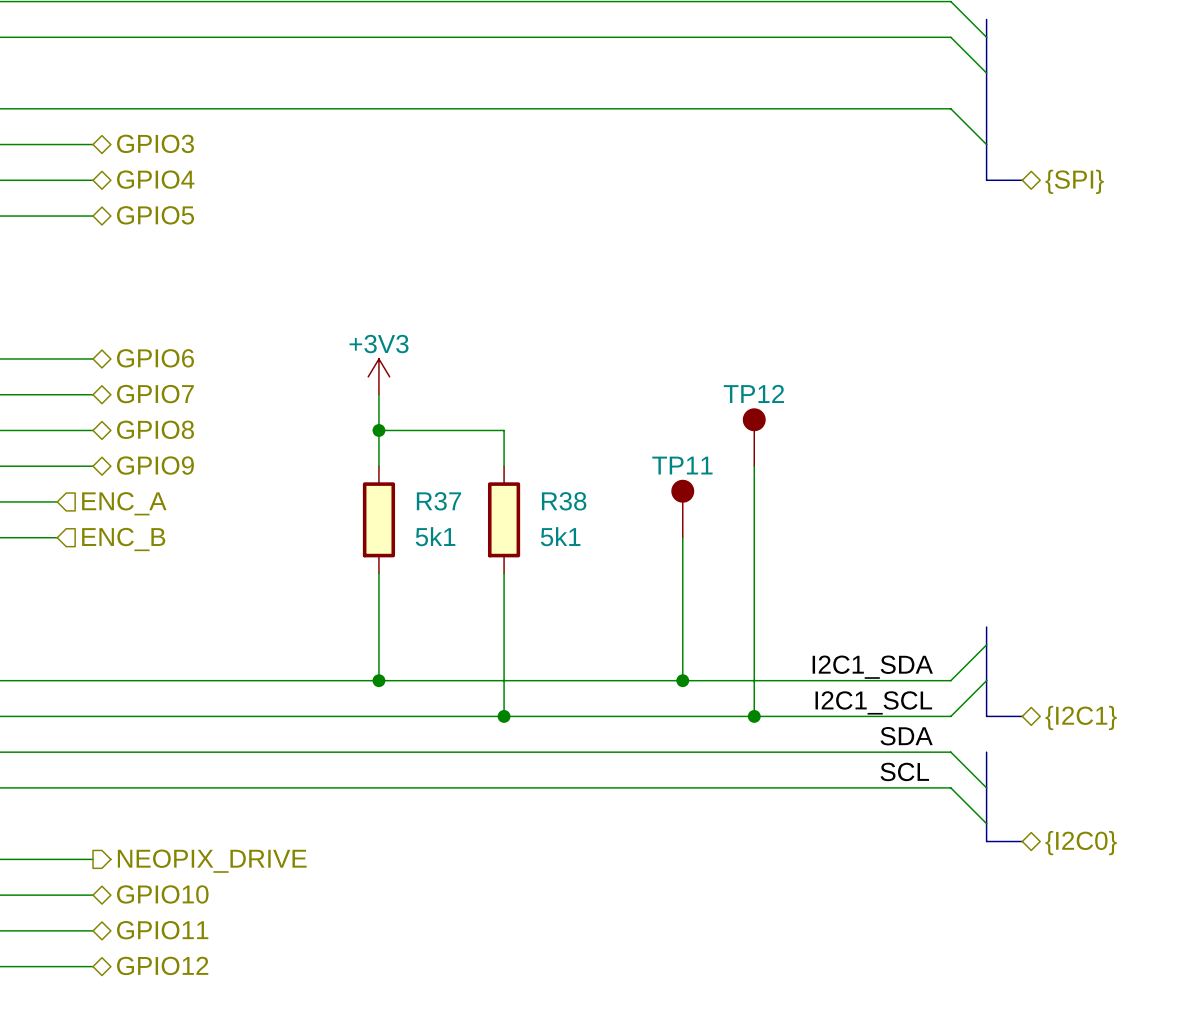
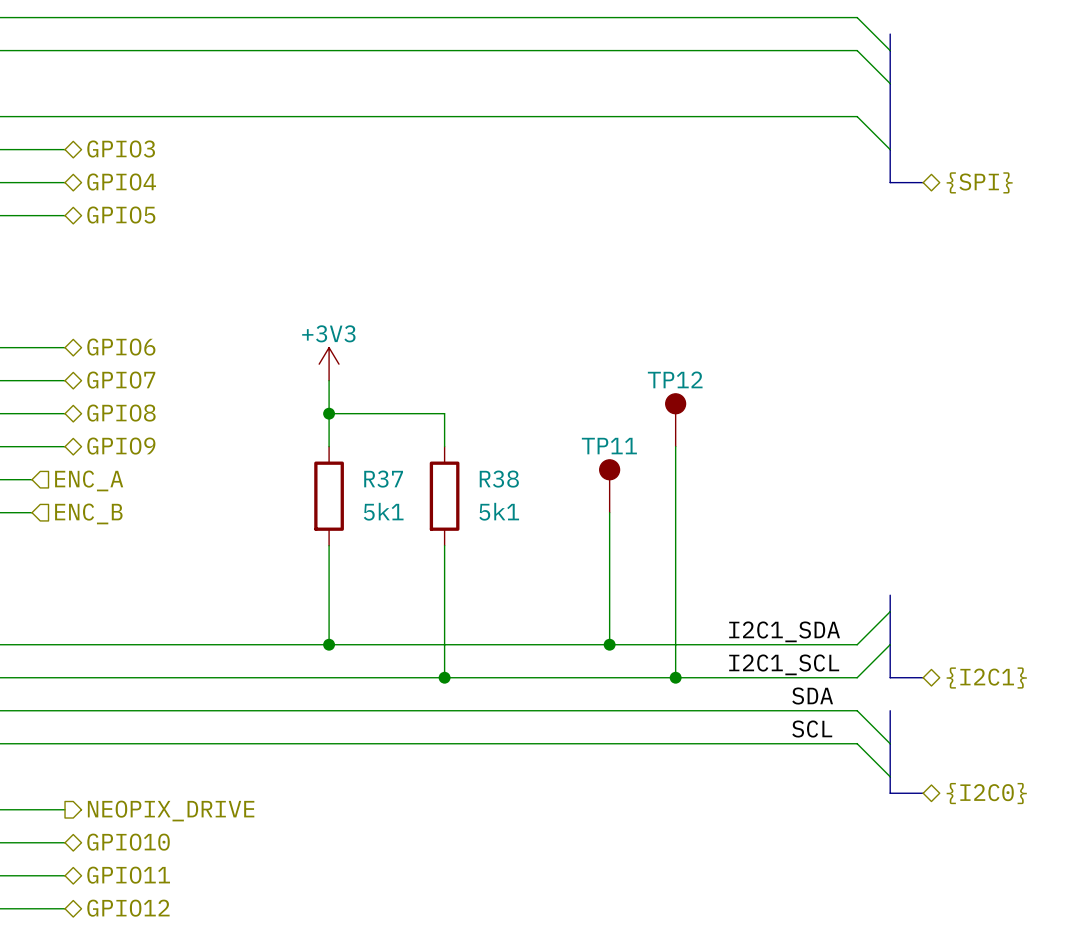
R37 symbol: [362, 466, 396, 574] -> [314, 446, 344, 546]
R38 symbol: [487, 466, 521, 574] -> [429, 446, 460, 546]

